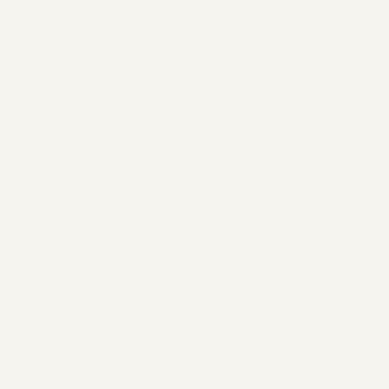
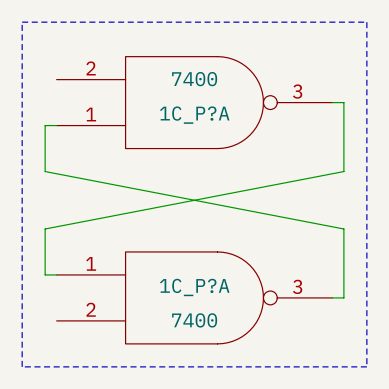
line: none -> (22, 22) (22, 366) (366, 366) (366, 22) (22, 22)
1C_P?A: none -> 7400 (194, 102)
wire: none -> (332, 102) (343, 102) (343, 171) (45, 228) (45, 274) (56, 274)
wire: none -> (56, 125) (45, 125) (45, 171) (343, 228) (343, 297) (332, 297)
1C_P?A: none -> 7400 (194, 297)

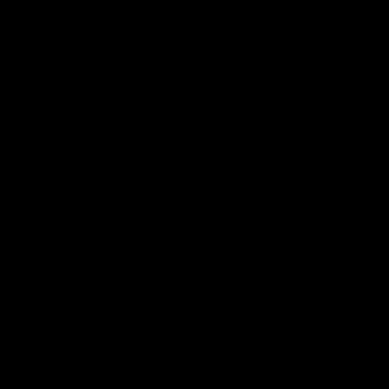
line: (22, 22) (22, 366) (366, 366) (366, 22) (22, 22) -> none
1C_P?A: 7400 (194, 102) -> none
wire: (332, 102) (343, 102) (343, 171) (45, 228) (45, 274) (56, 274) -> none
wire: (56, 125) (45, 125) (45, 171) (343, 228) (343, 297) (332, 297) -> none
1C_P?A: 7400 (194, 297) -> none

